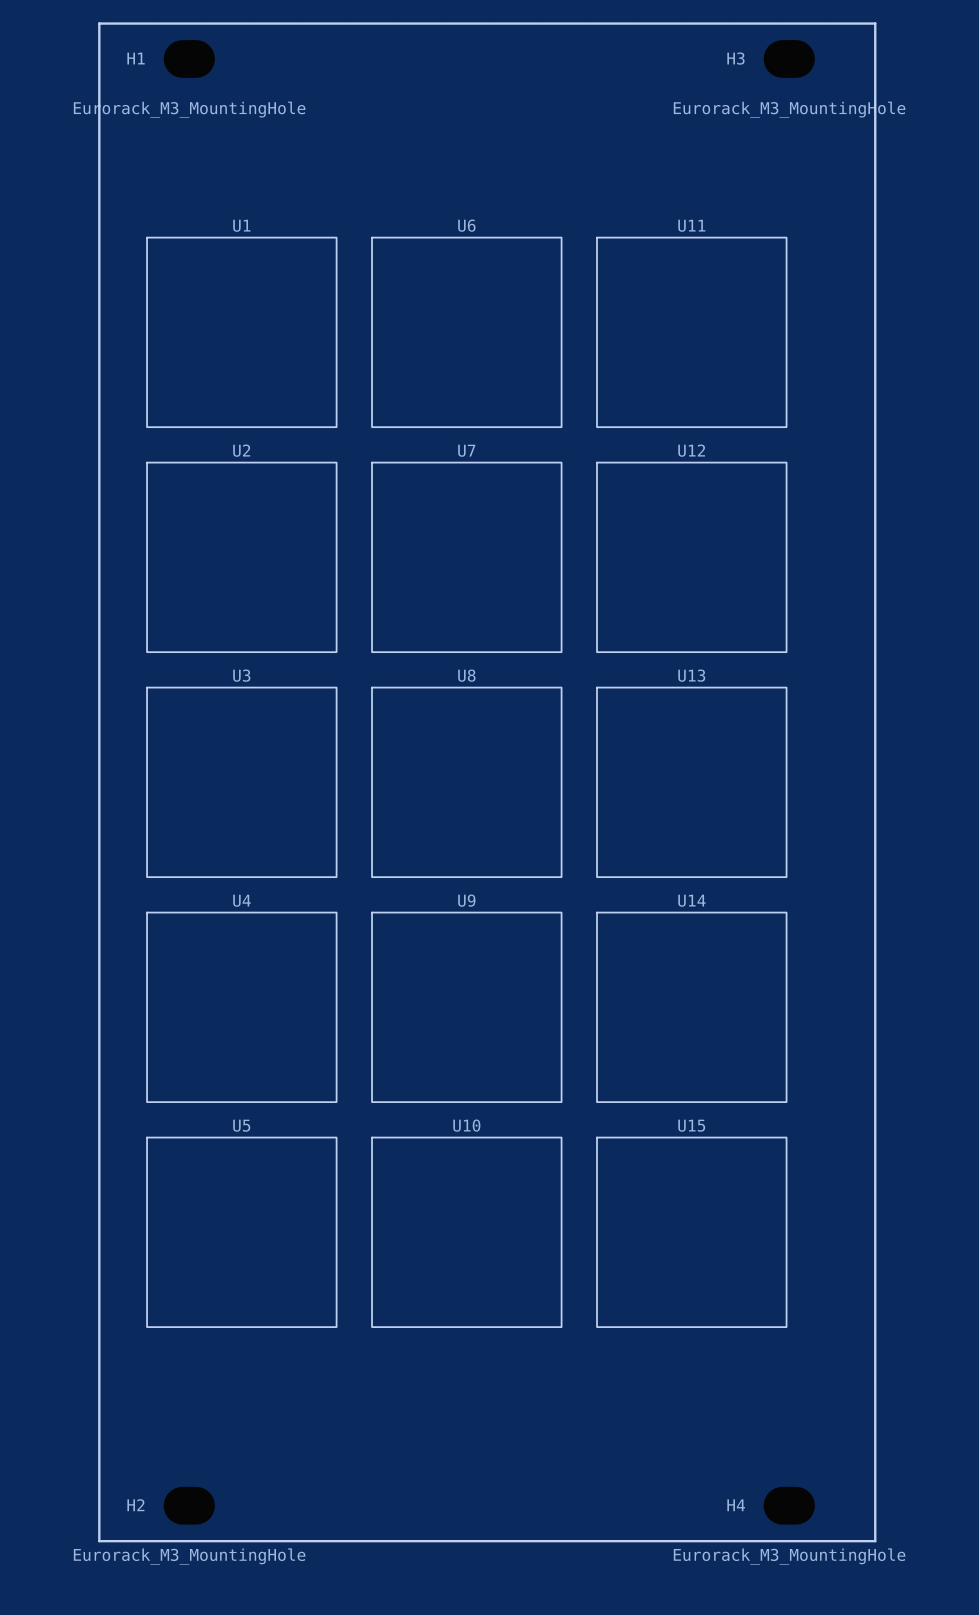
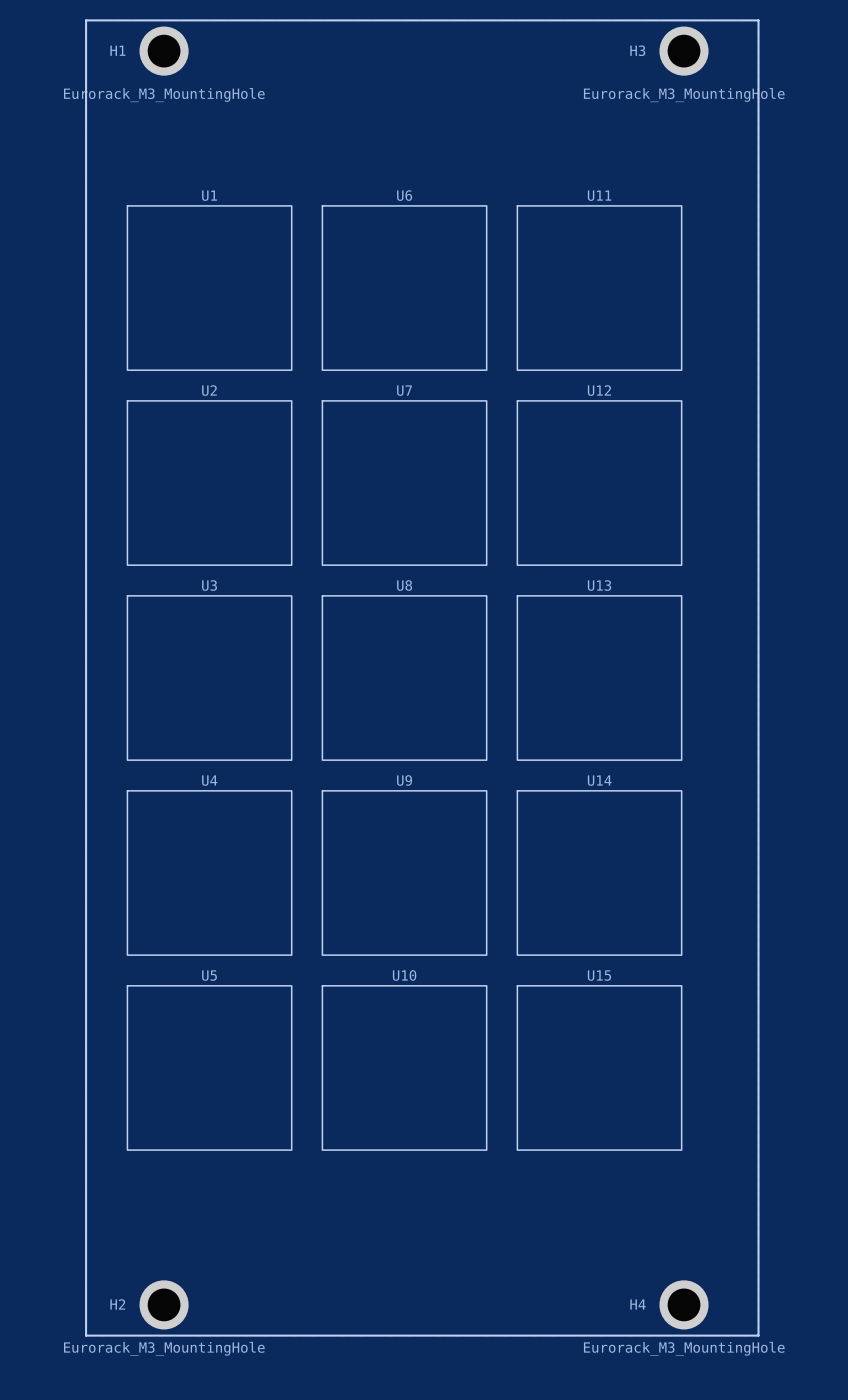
H1 footprint: [163, 40, 215, 78] -> [139, 26, 189, 76]
H3 footprint: [763, 40, 815, 78] -> [659, 26, 709, 76]
H2 footprint: [163, 1486, 215, 1525] -> [139, 1280, 189, 1330]
H4 footprint: [763, 1486, 815, 1525] -> [659, 1280, 709, 1330]

